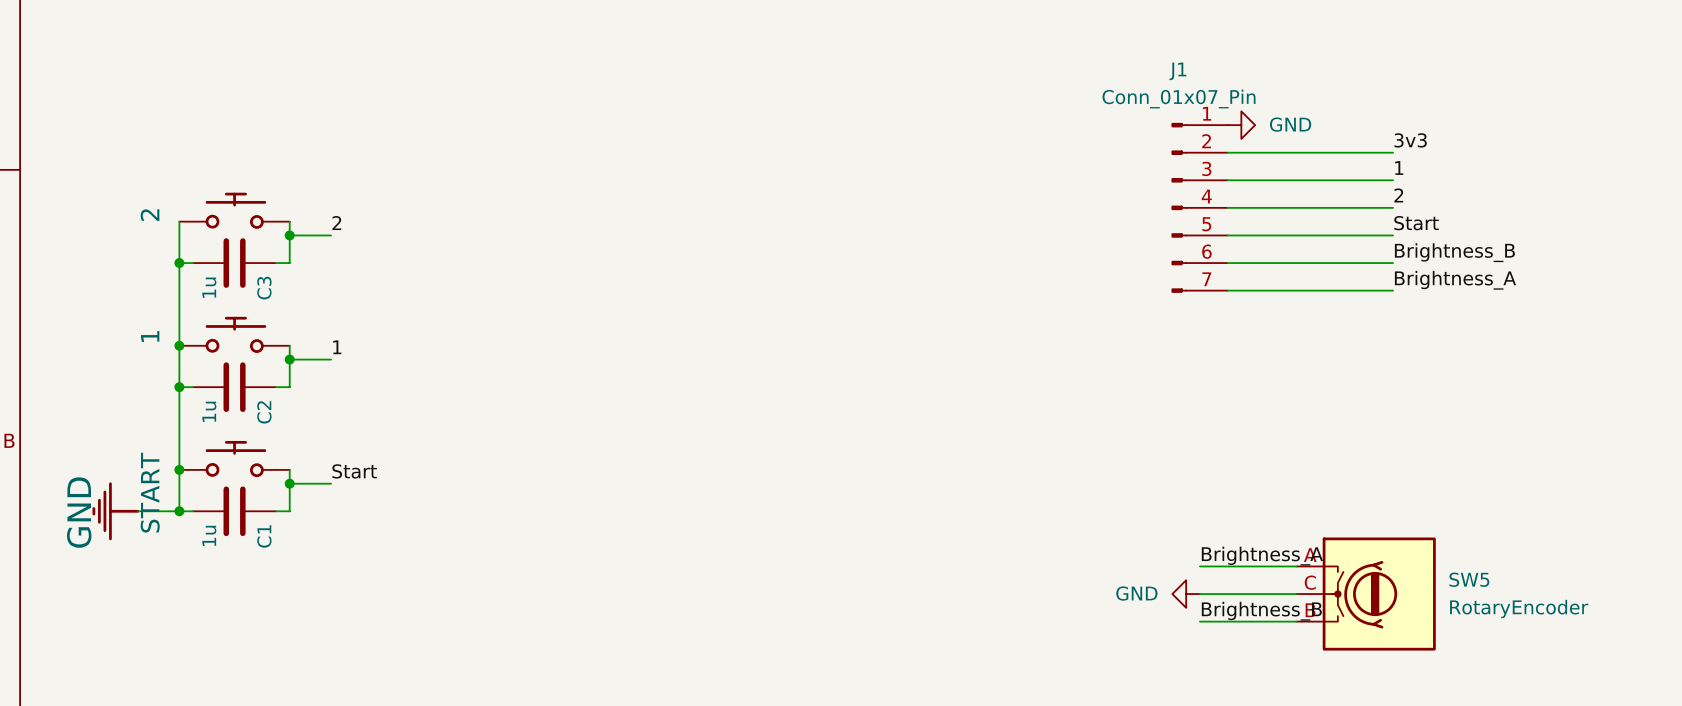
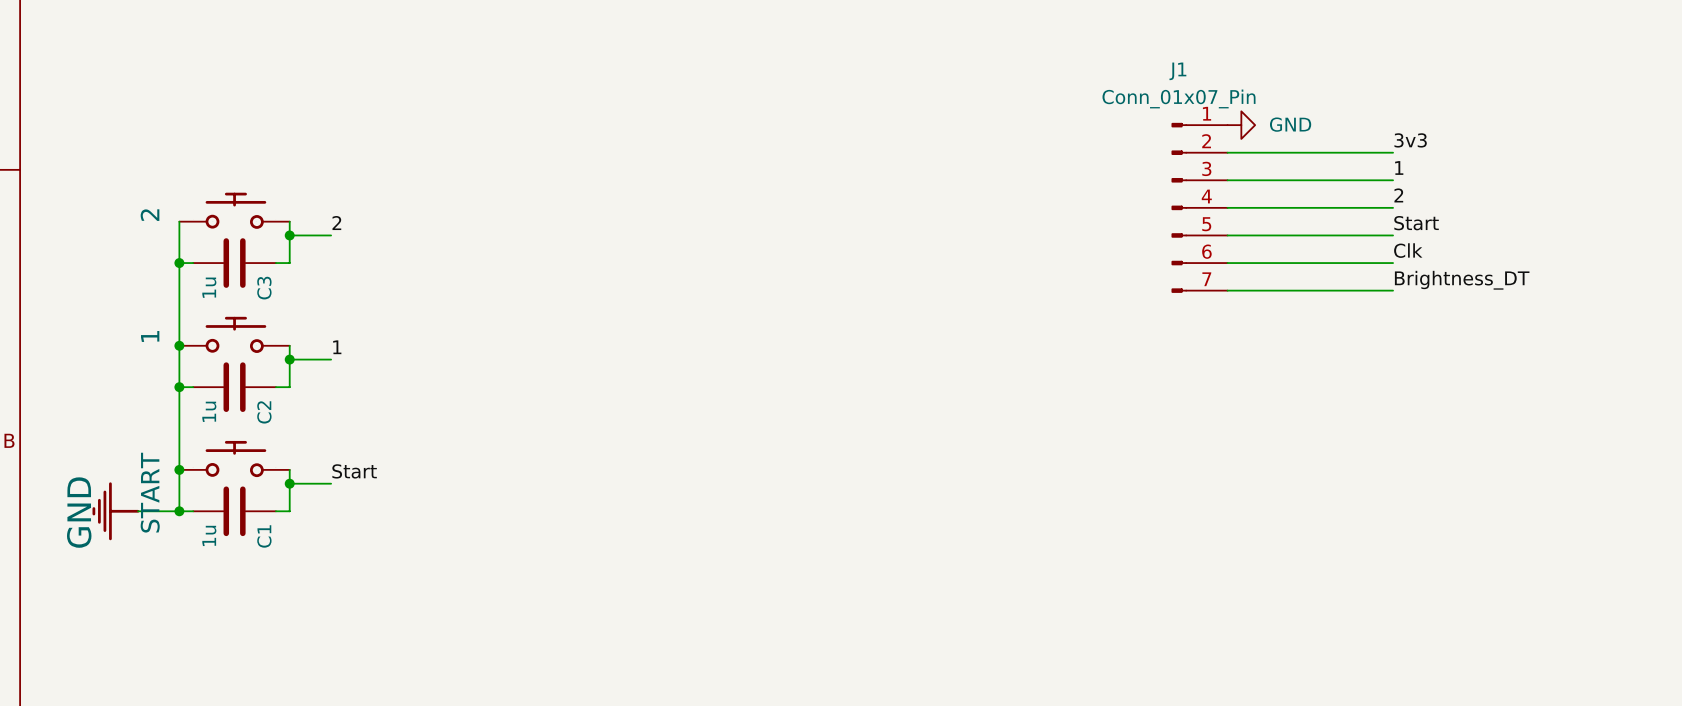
label: Brightness_B (1454, 252) -> Clk (1408, 250)
label: Brightness_A (1455, 280) -> Brightness_DT (1462, 280)
label: Brightness_A (1262, 556) -> none
wire: (1199, 566) (1296, 566) -> none
power symbol: GND (1186, 594) -> none
wire: (1199, 594) (1296, 594) -> none
SW5: RotaryEncoder (1366, 594) -> none
label: Brightness_B (1261, 611) -> none
wire: (1199, 621) (1296, 621) -> none

